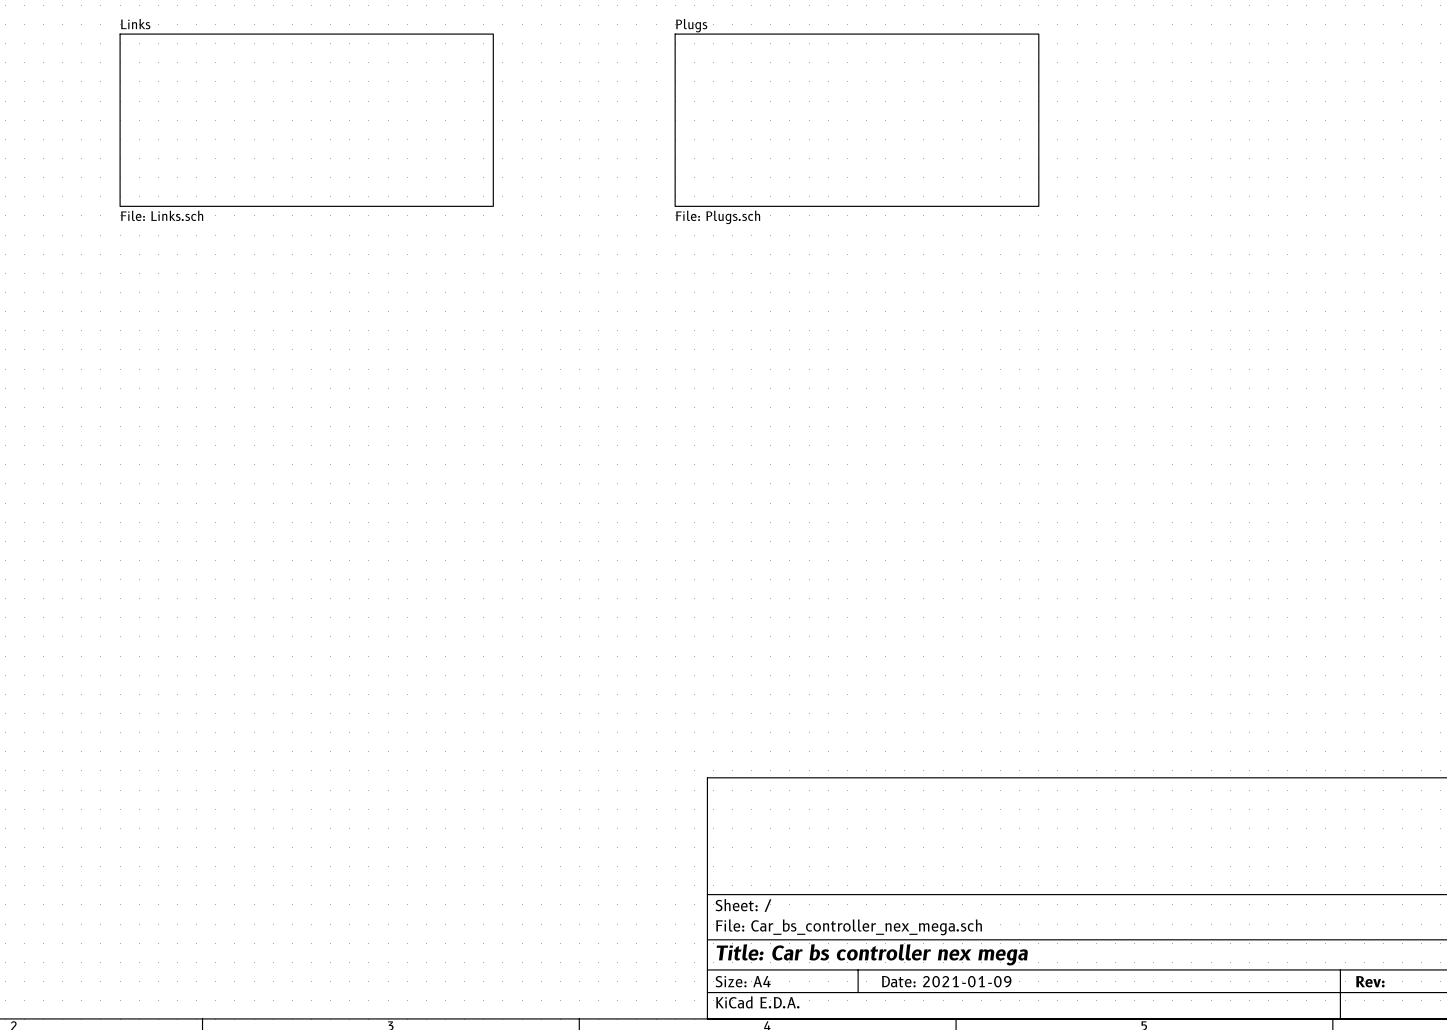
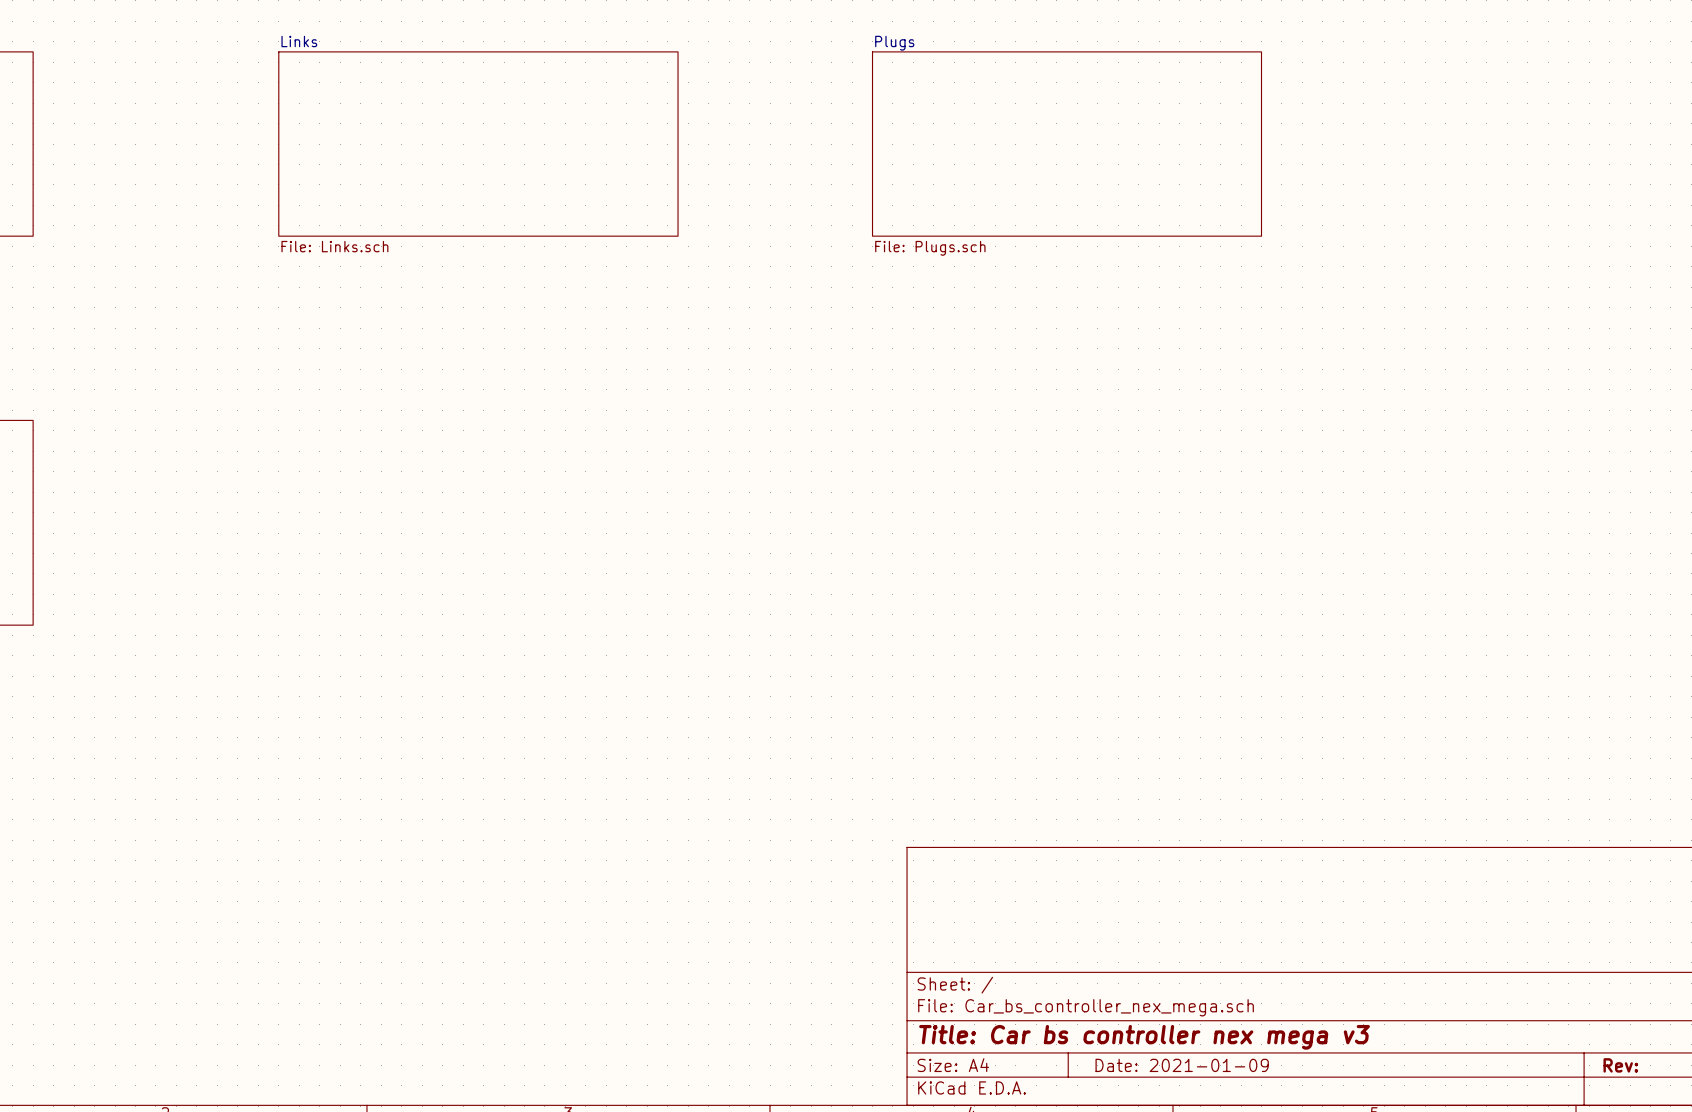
title block: Title: Car bs controller nex mega (872, 954) -> Title: Car bs controller nex mega v3 (1144, 1037)

